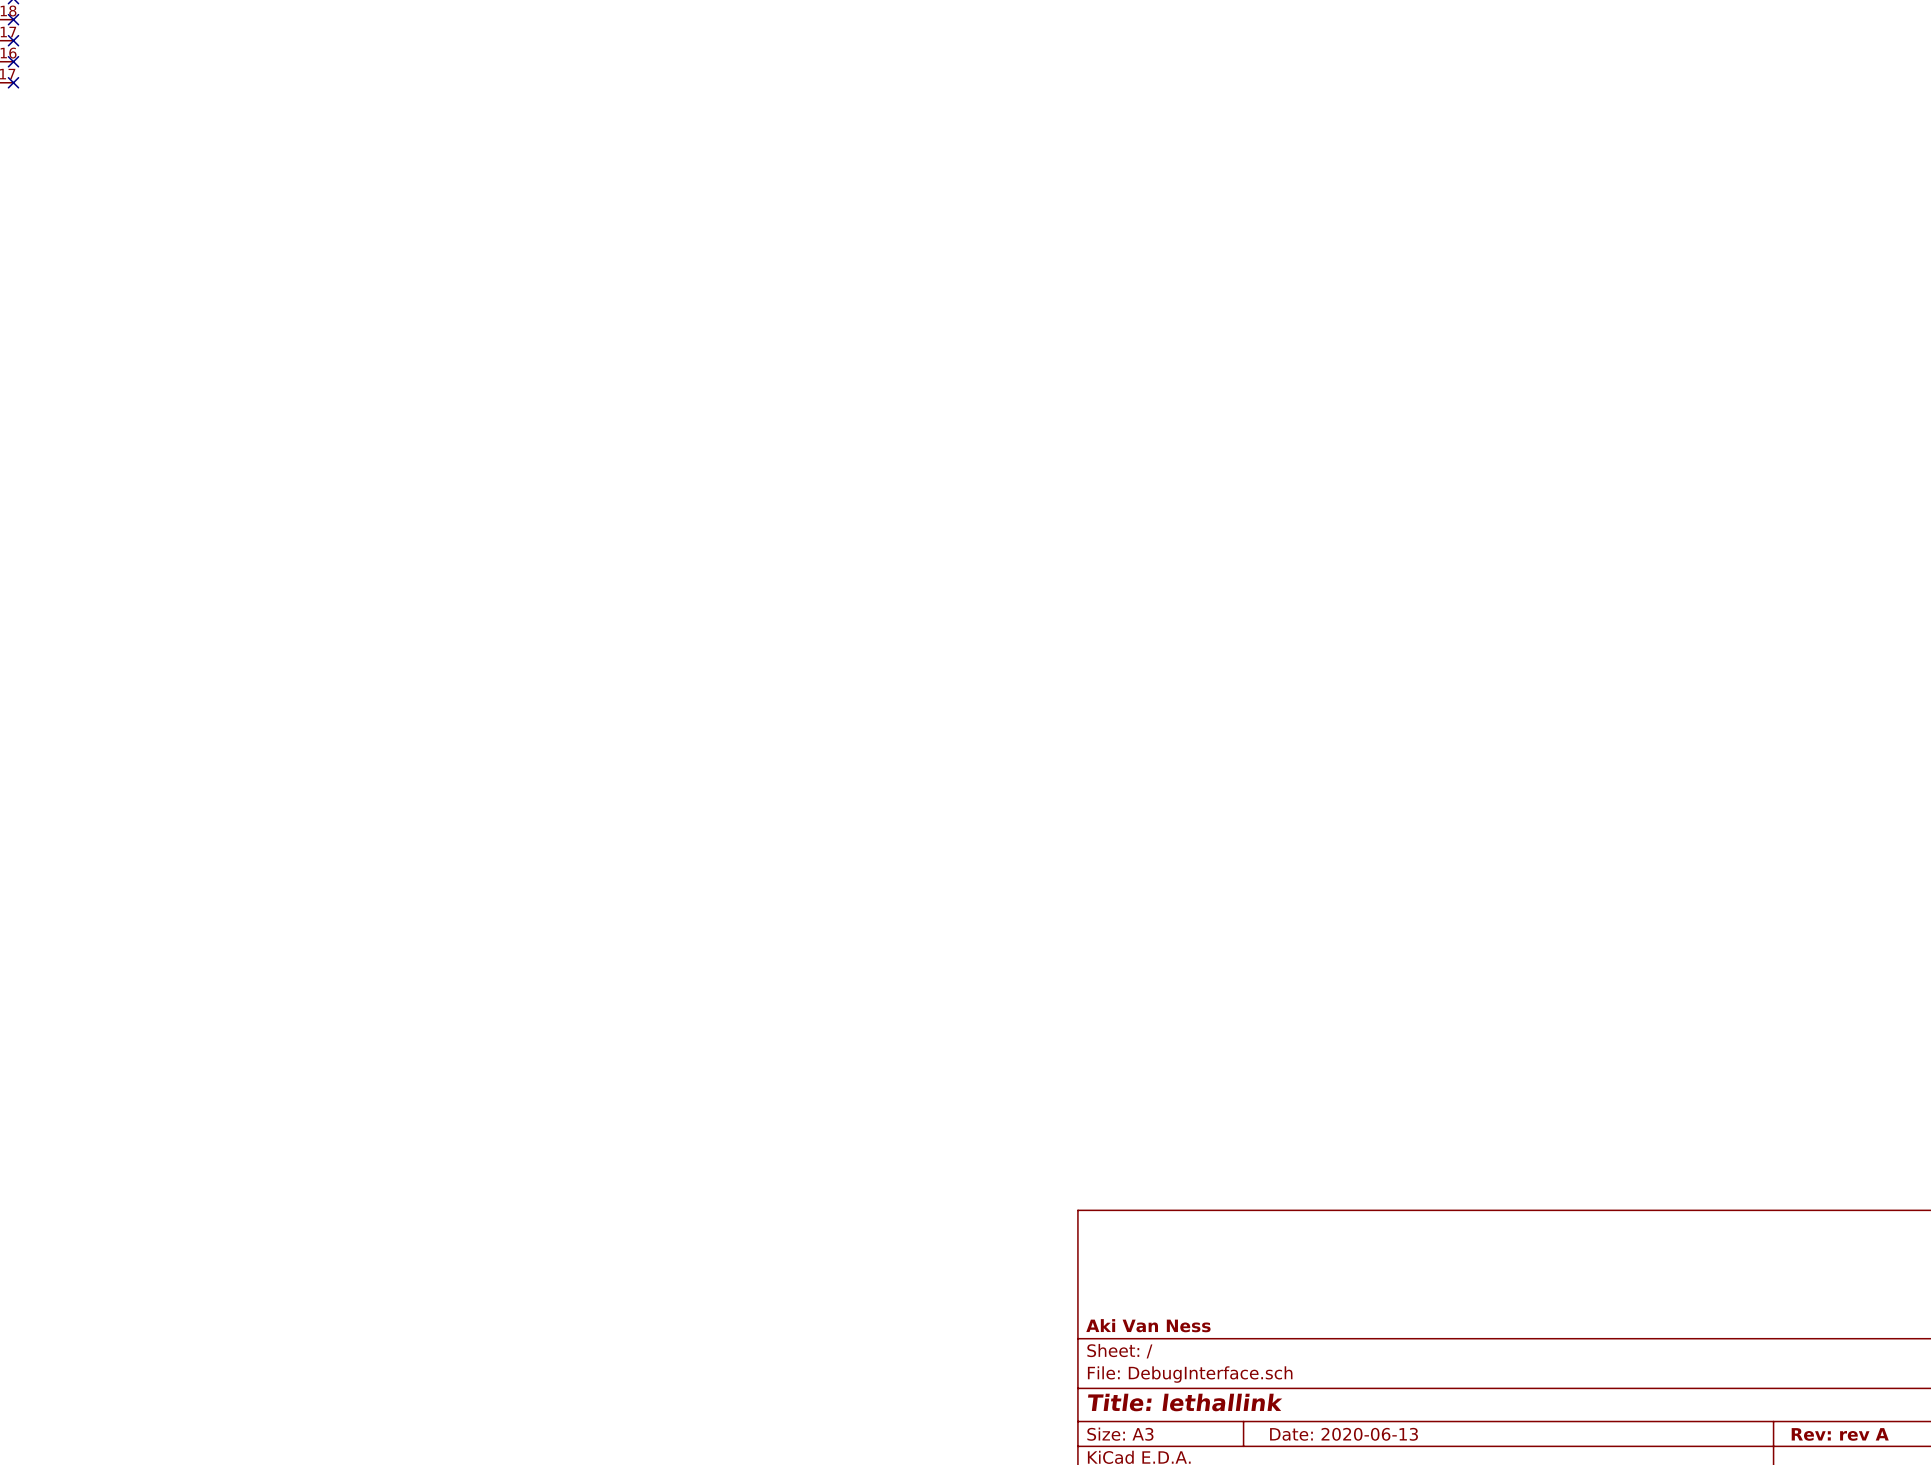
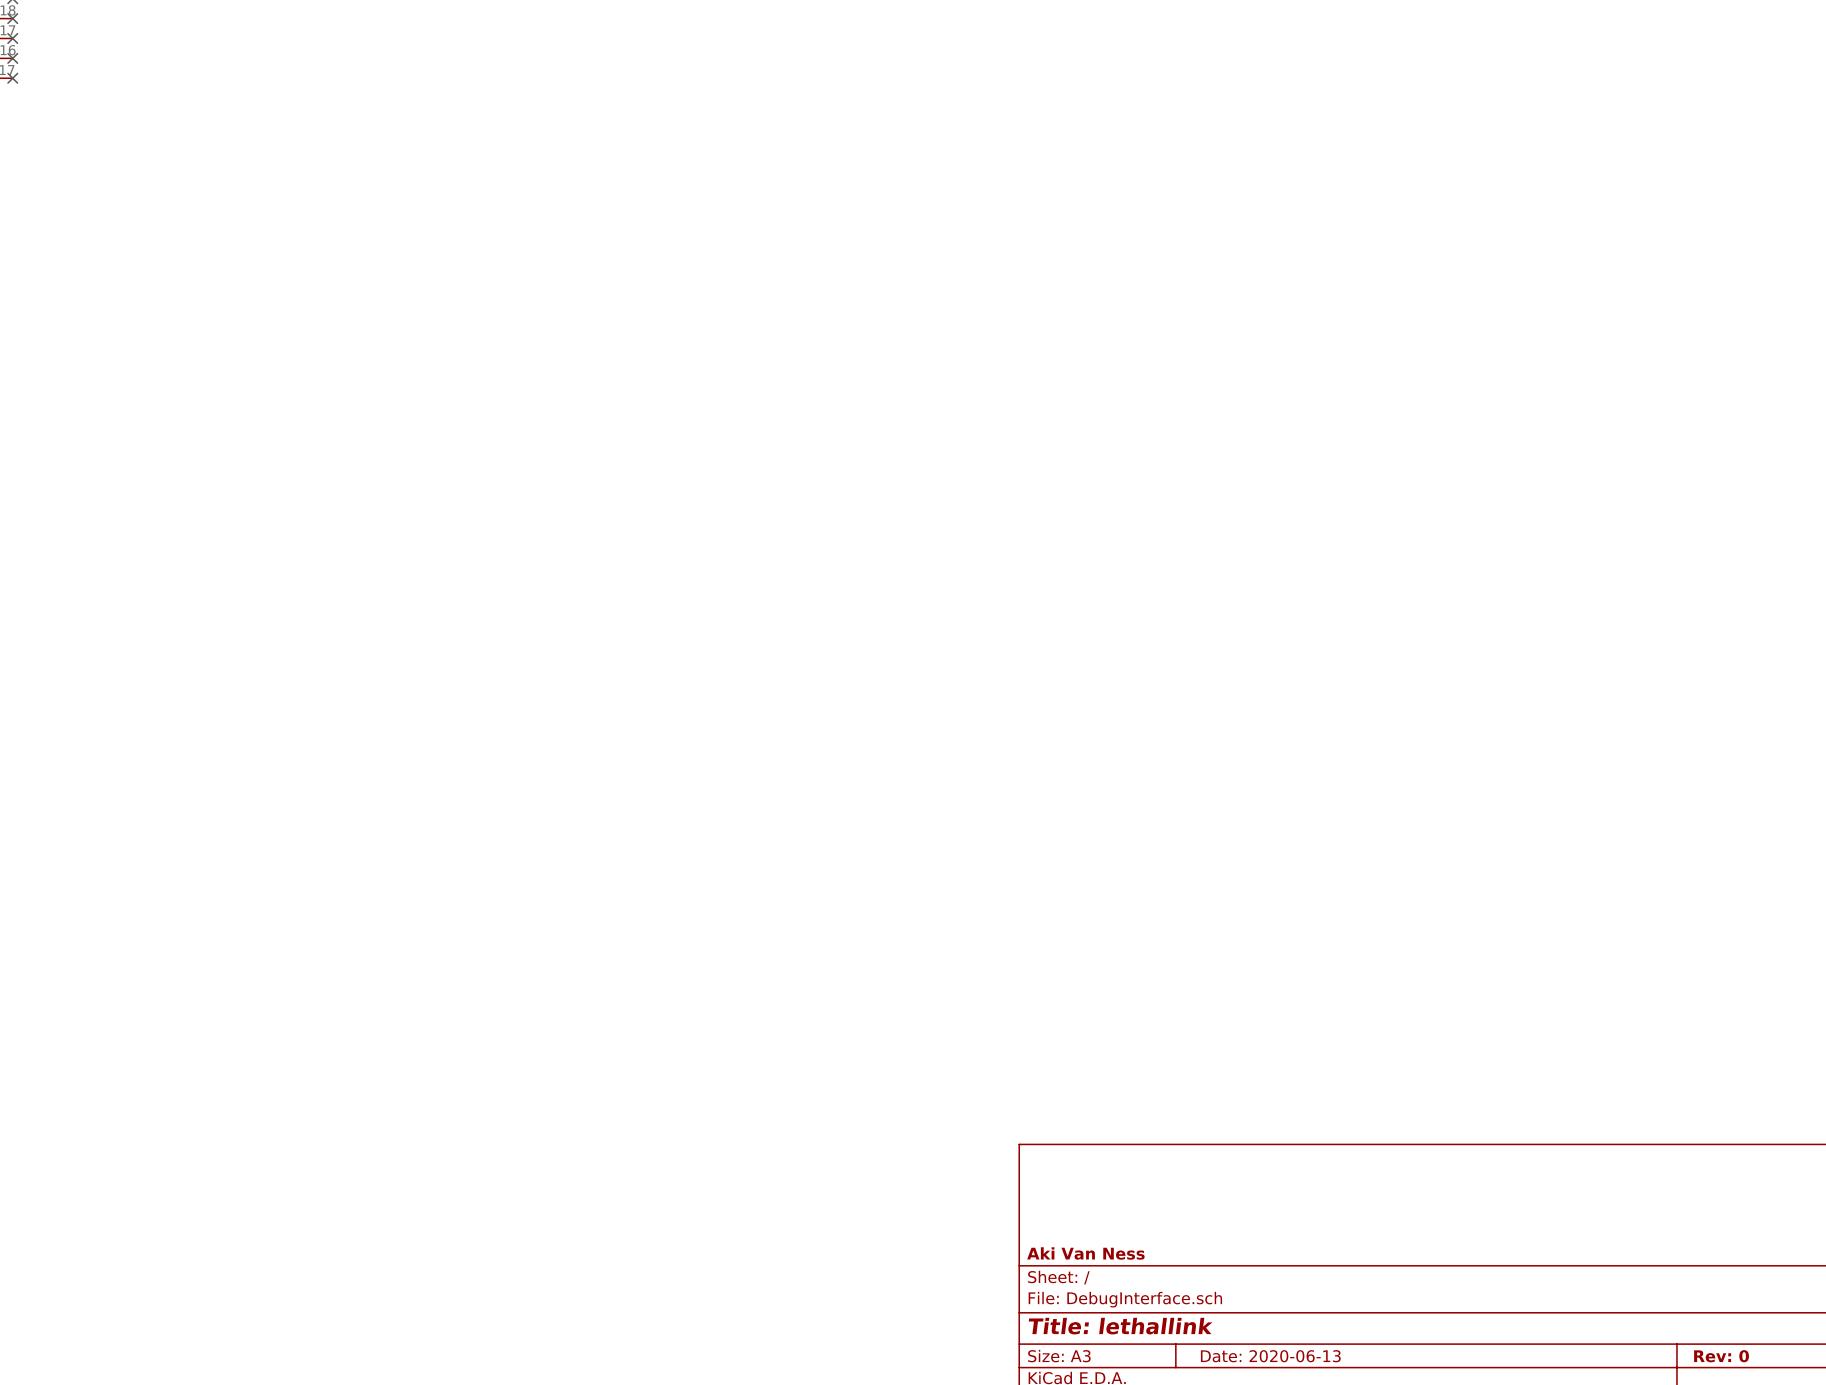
title block: Rev: rev A (1840, 1434) -> Rev: 0 (1721, 1356)

